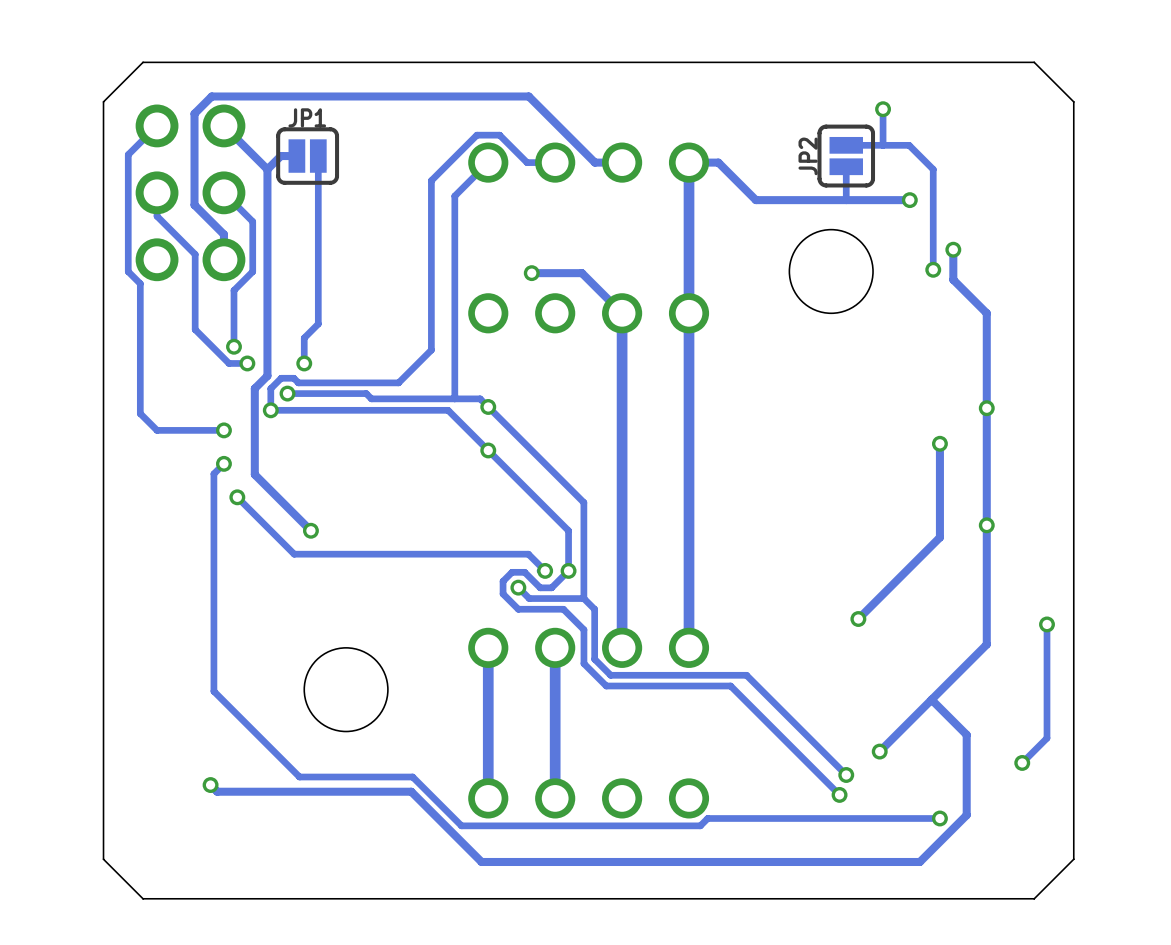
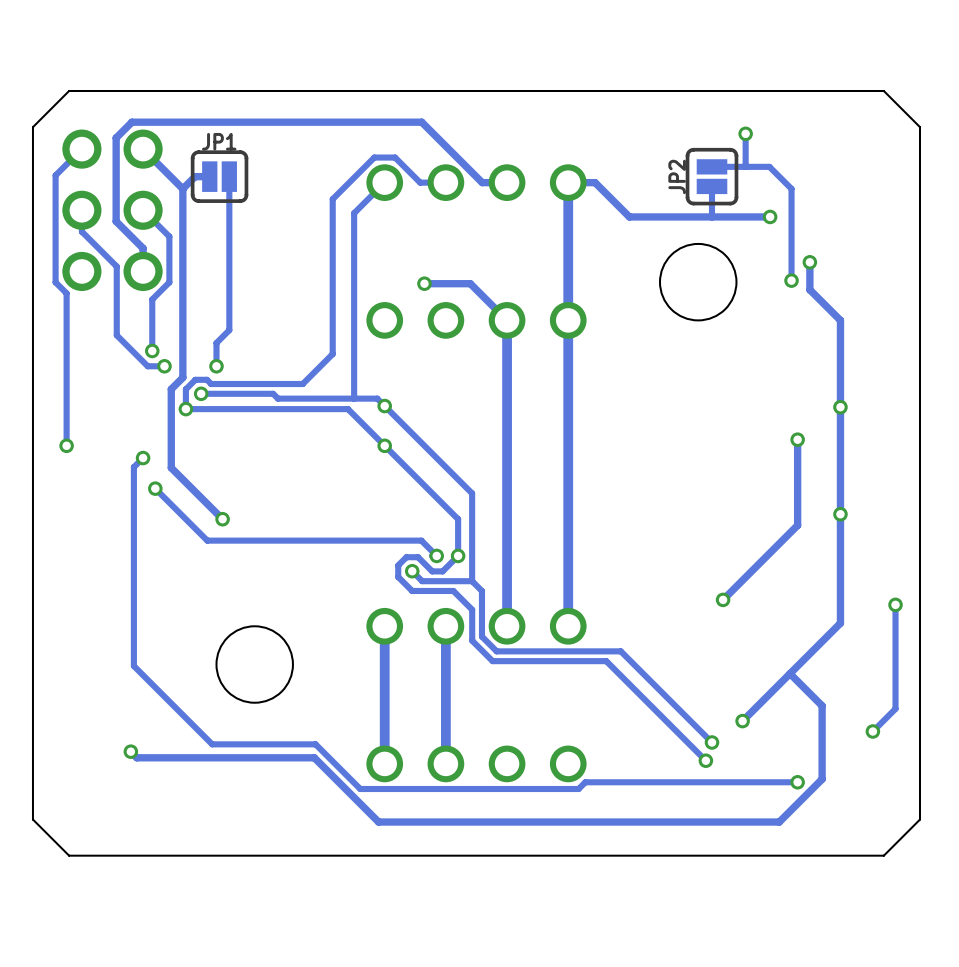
track: (140, 413) (157, 430) (223, 430) -> (66, 412) (66, 445)
via position: (223, 430) -> (66, 445)

